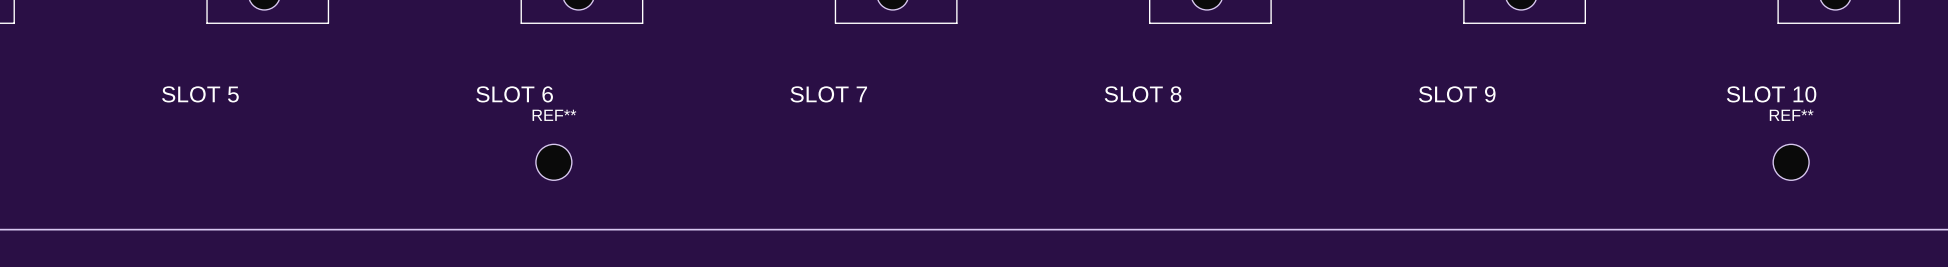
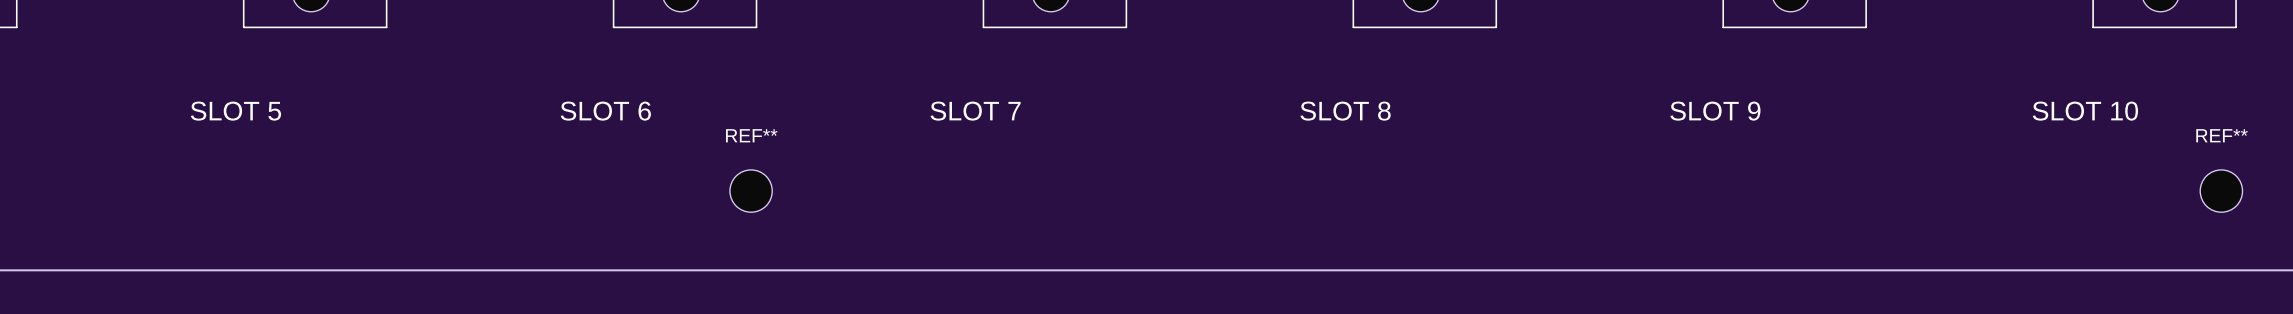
REF** position: (553, 162) -> (751, 191)
REF** position: (1791, 162) -> (2221, 191)

